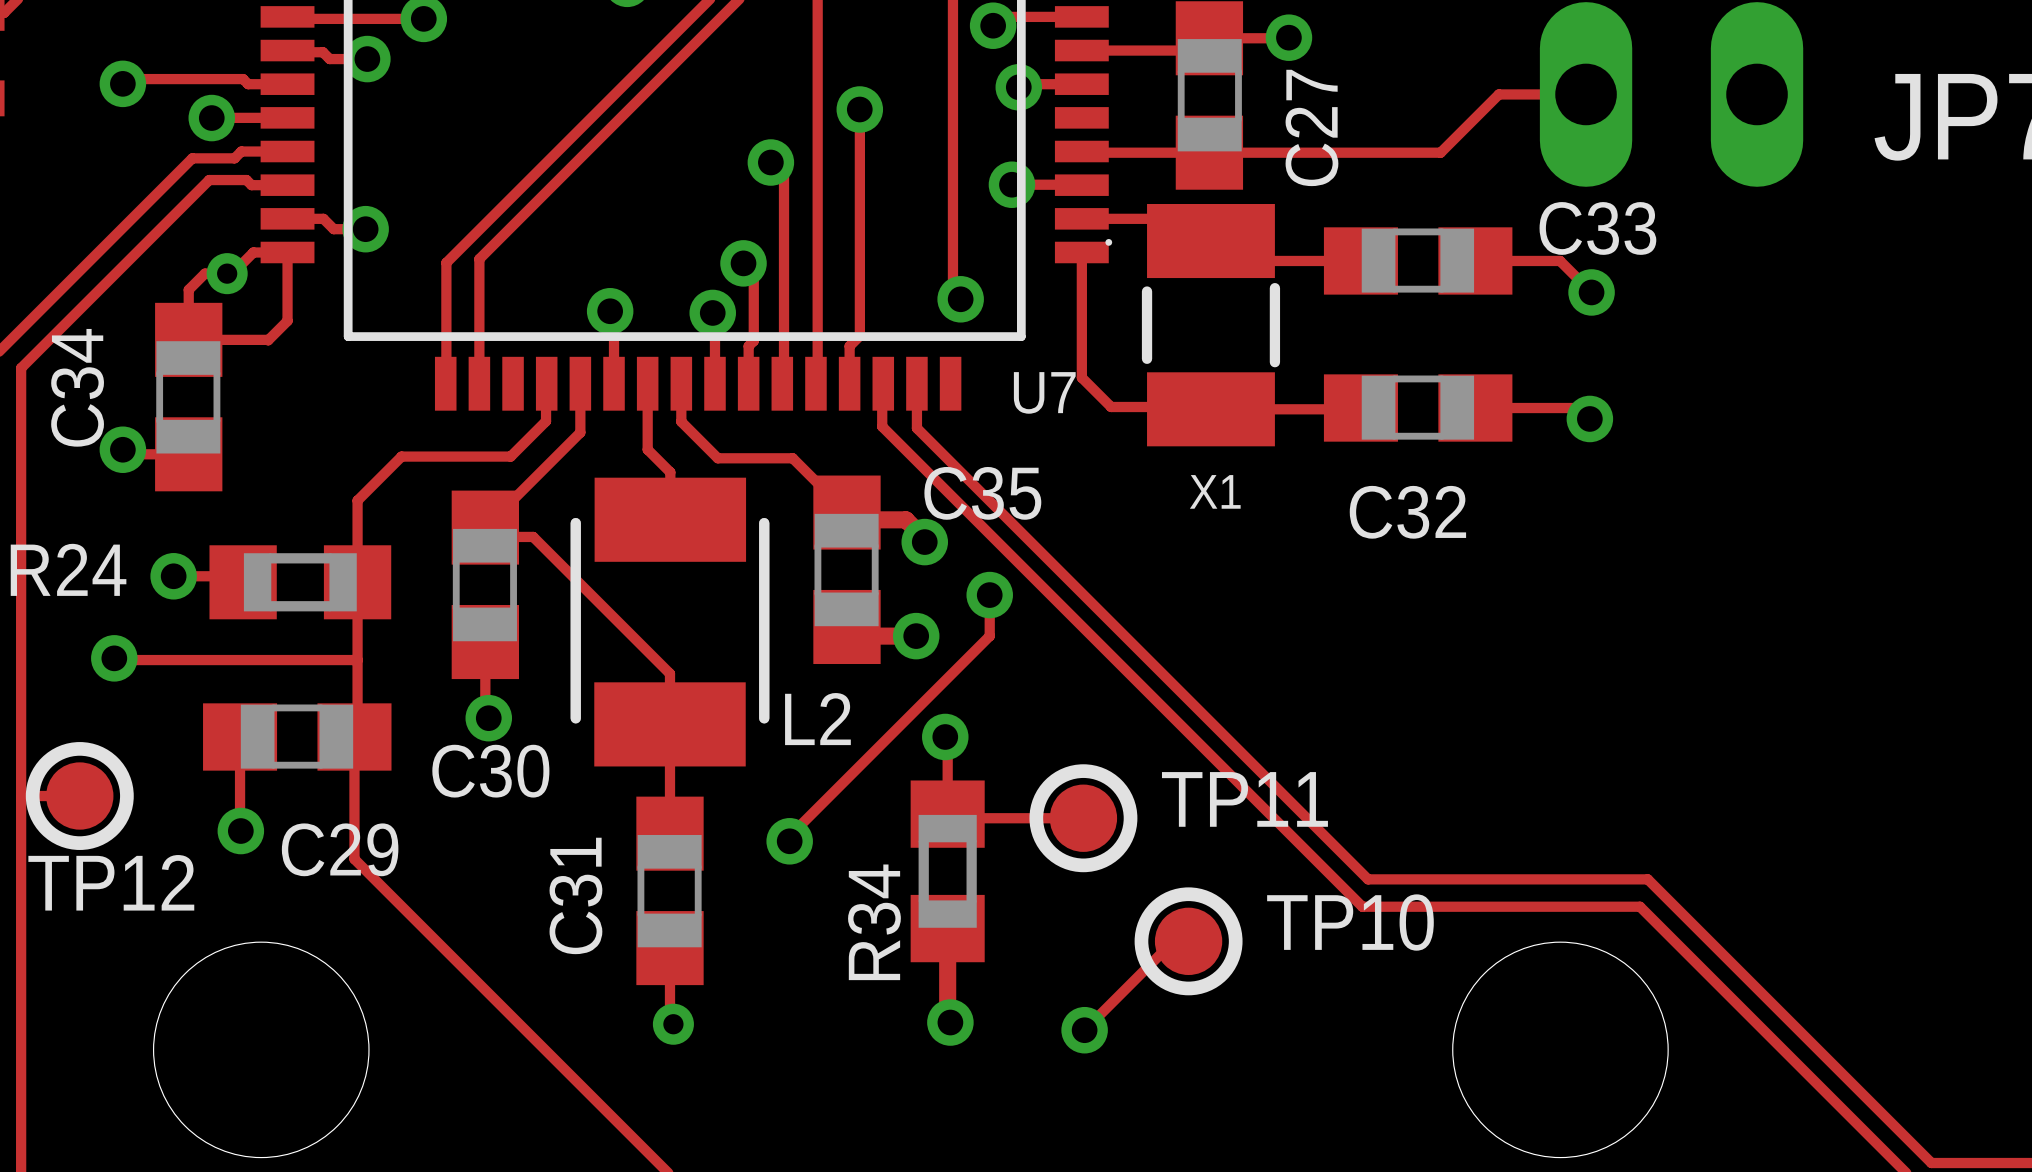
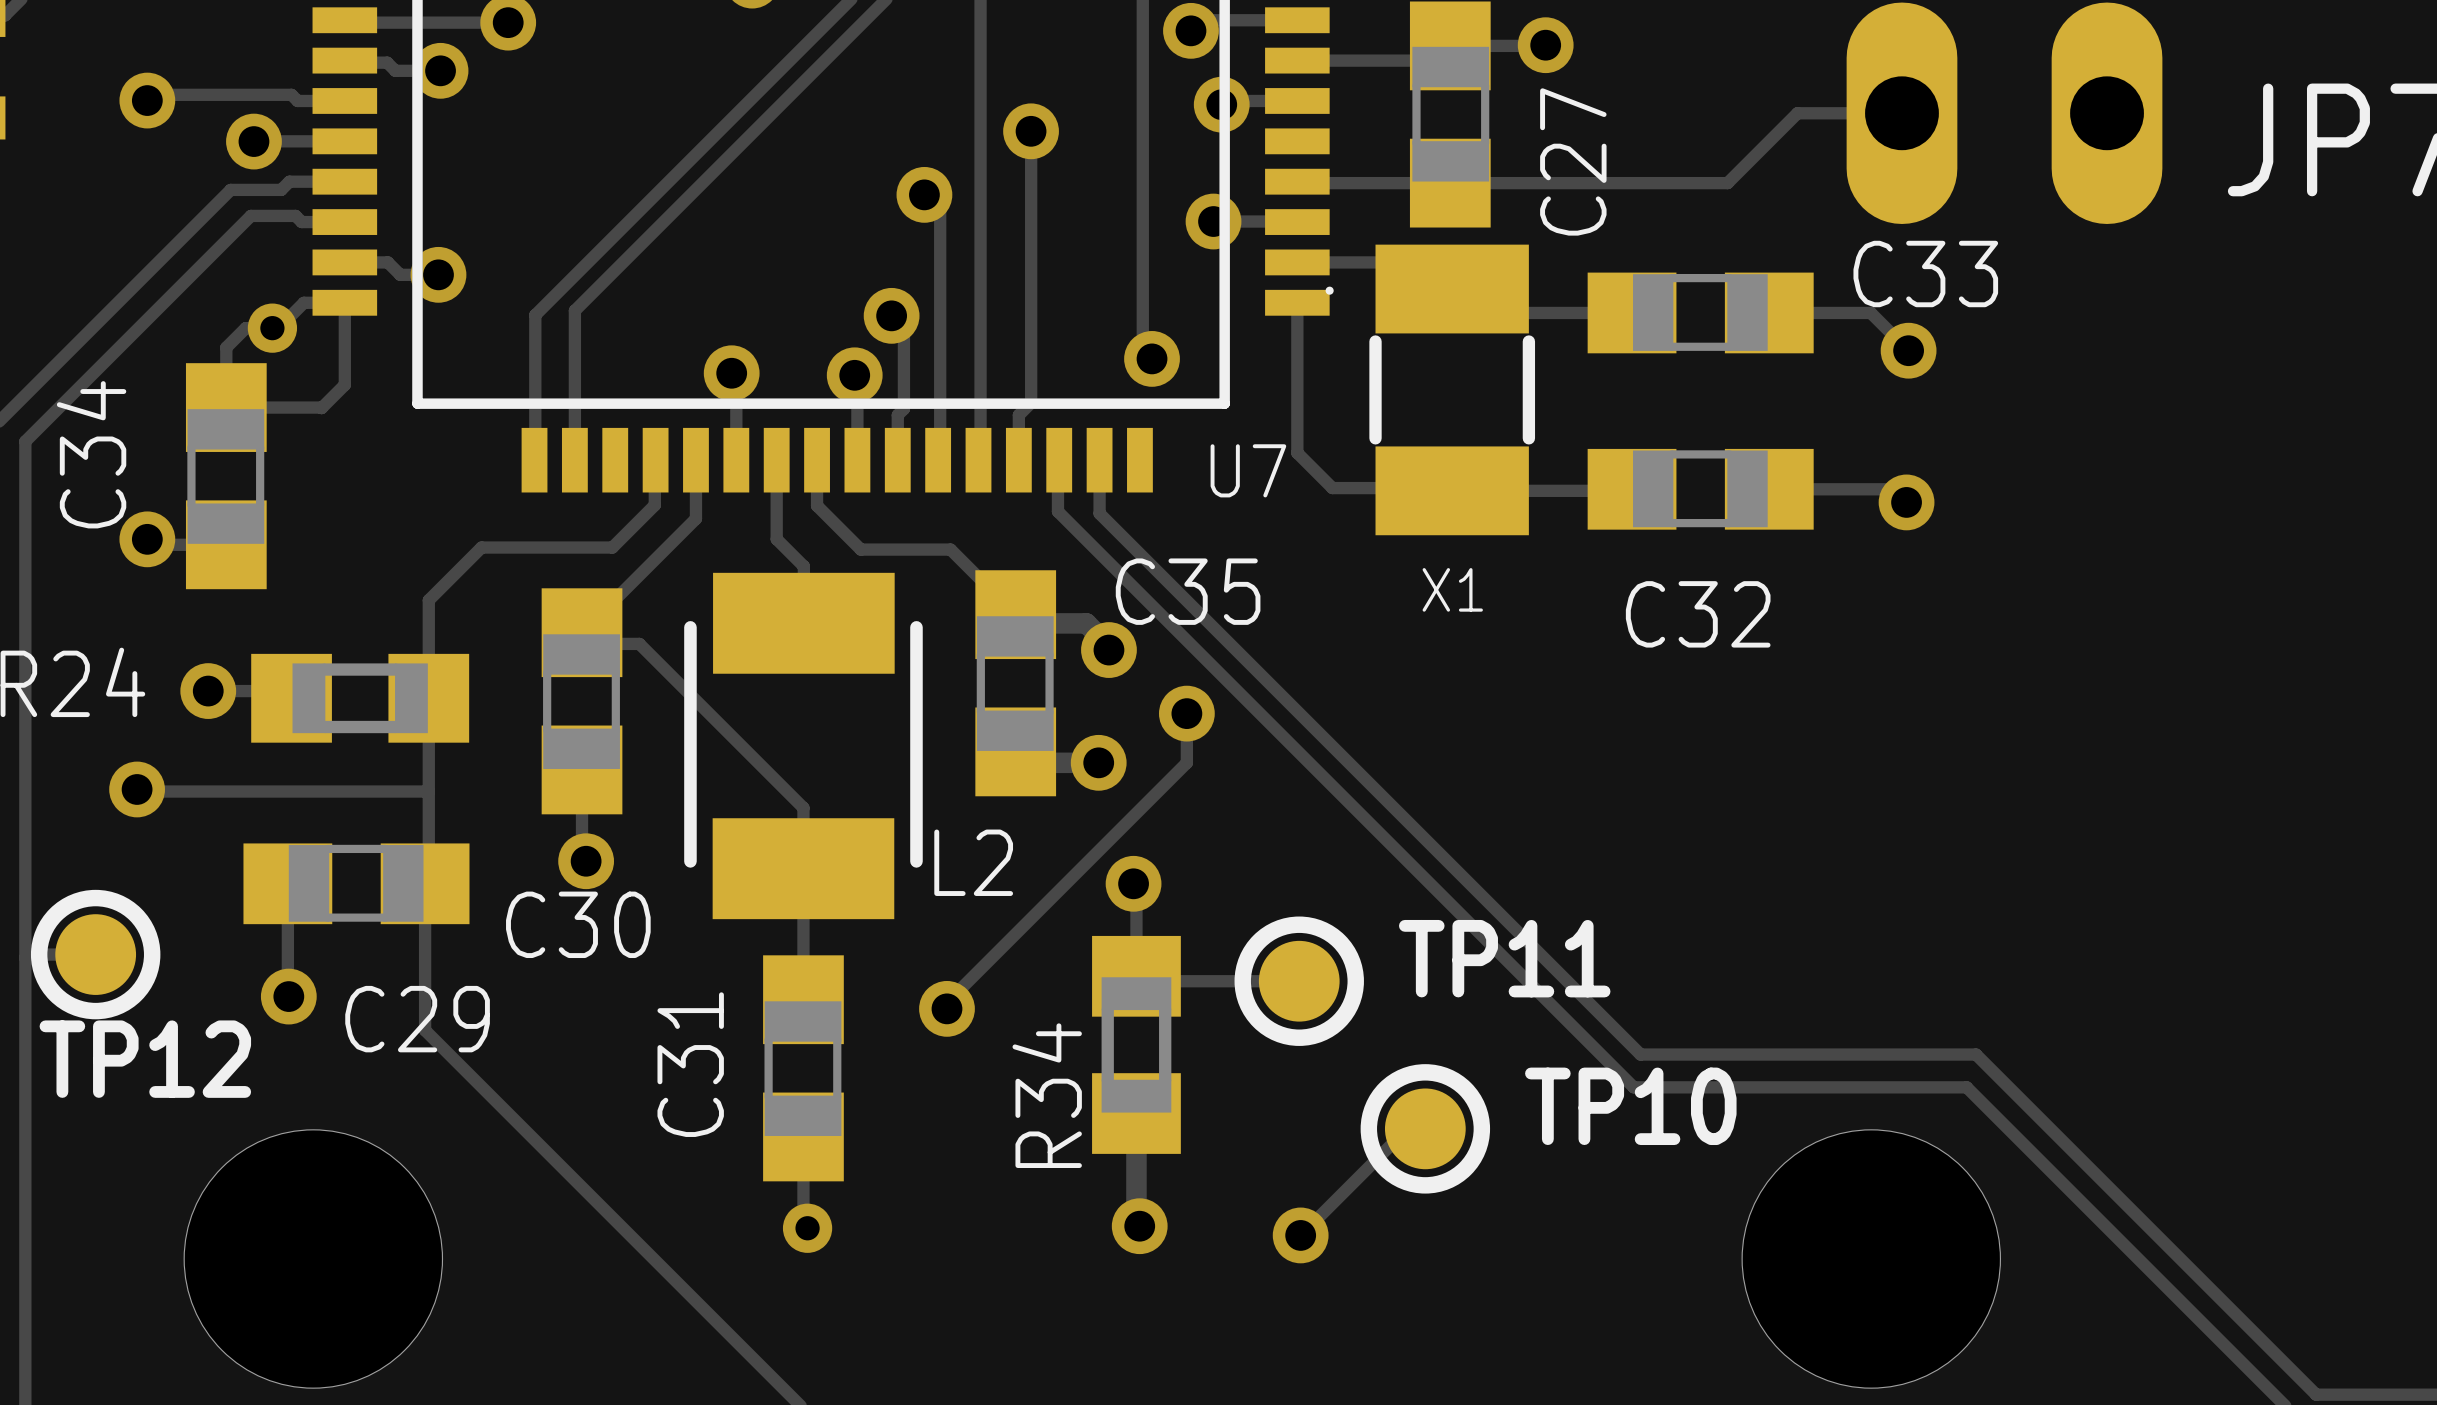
X1 footprint: [1141, 203, 1281, 447] -> [1369, 244, 1536, 536]

